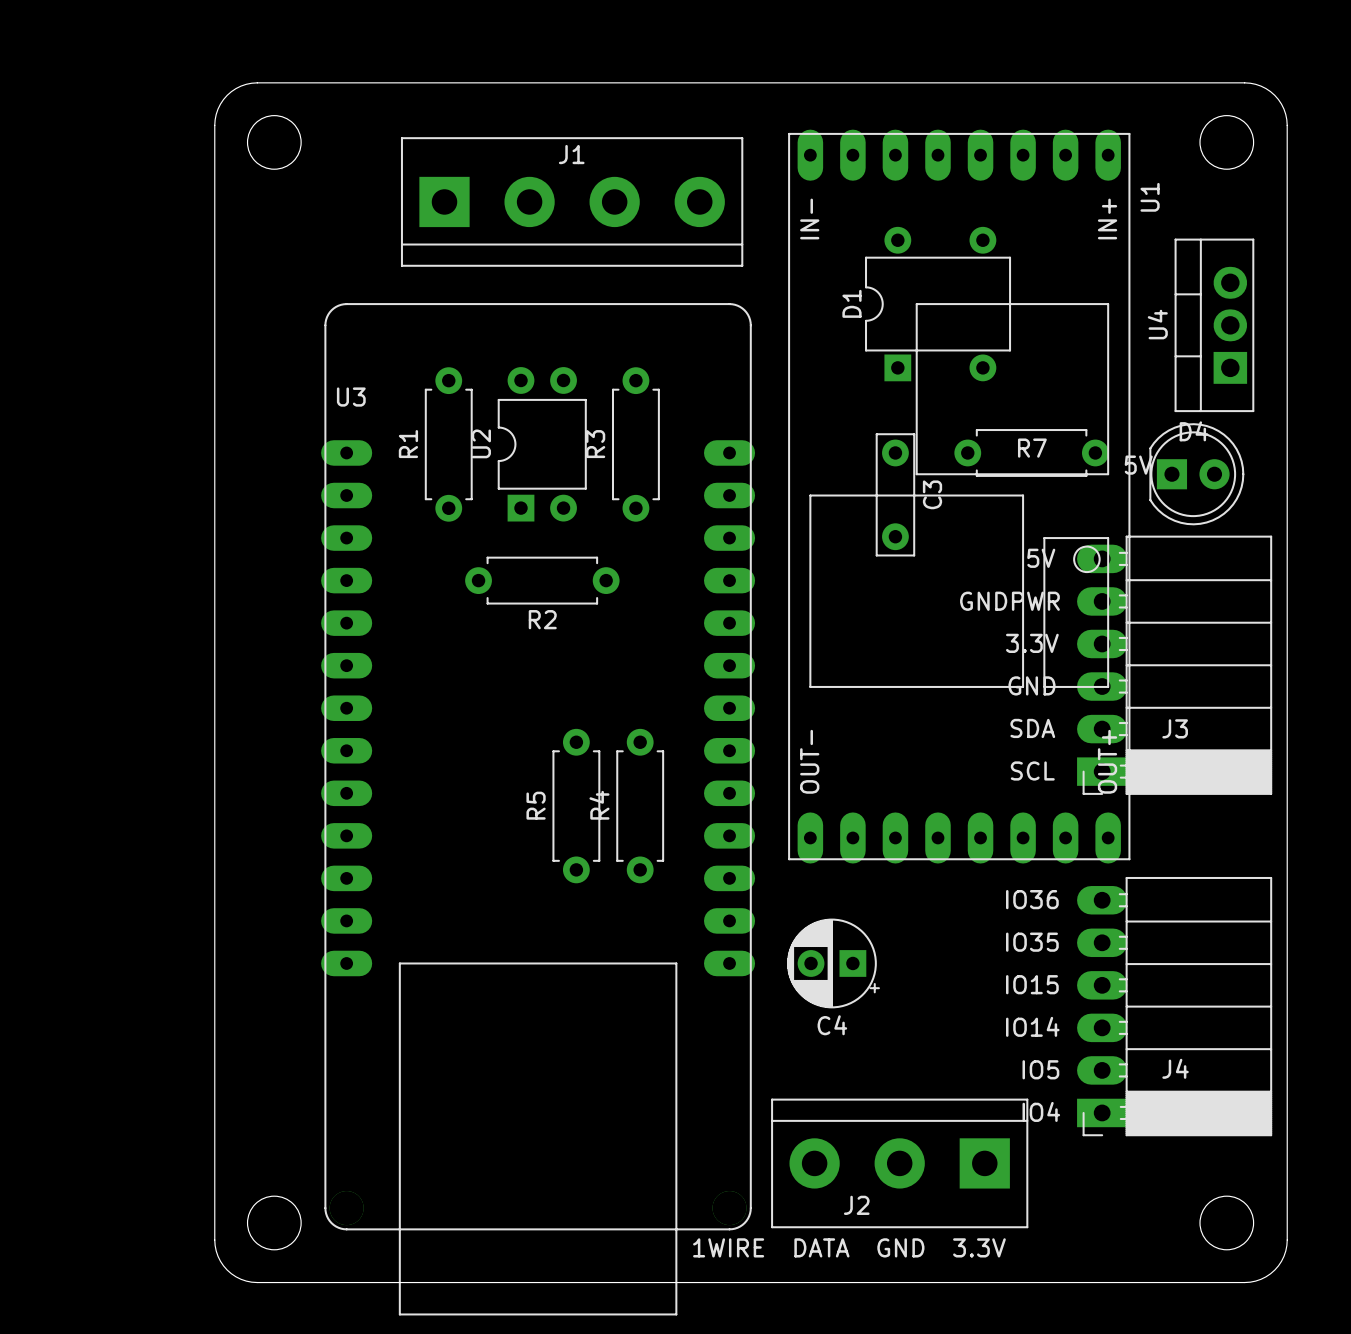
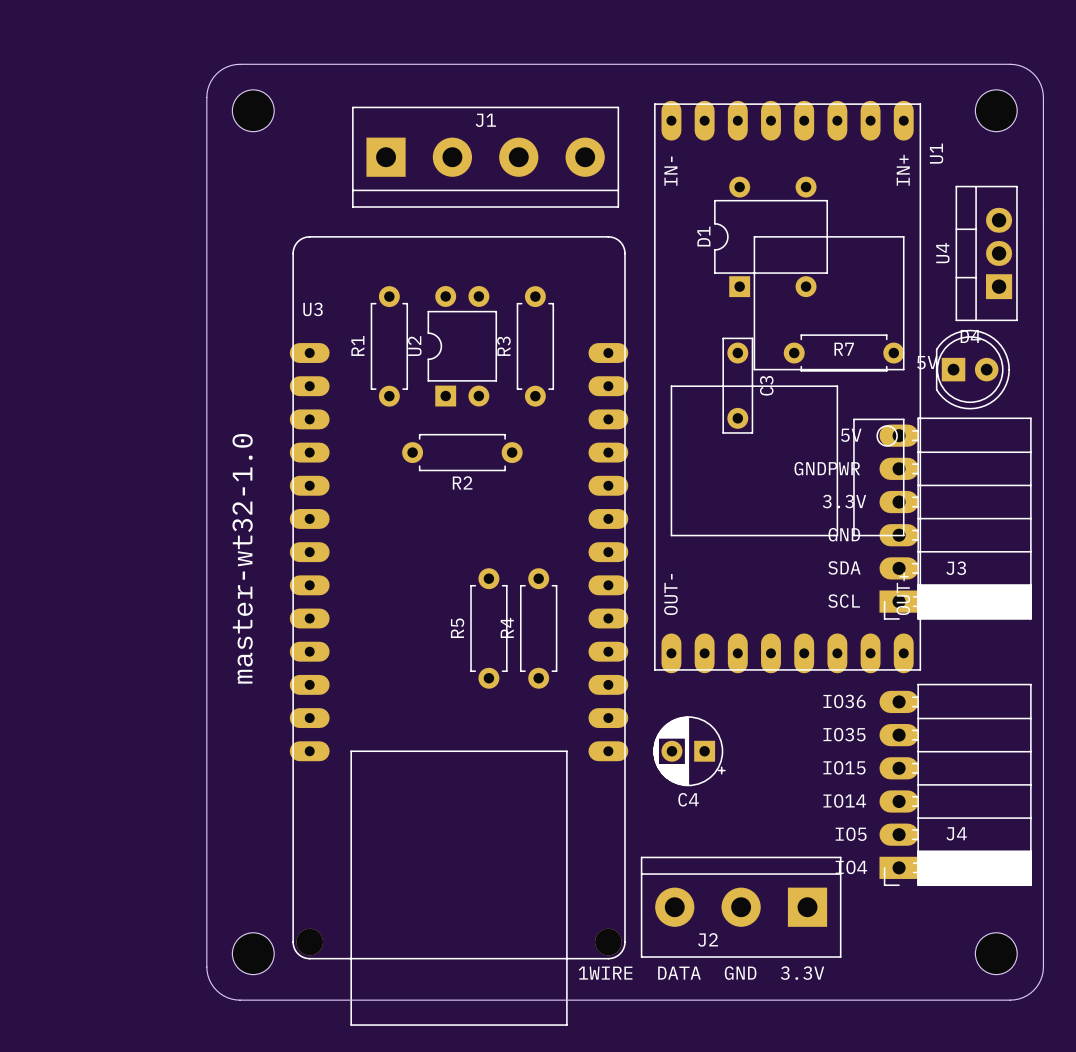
text: none -> master-wt32-1.0 (242, 558)

